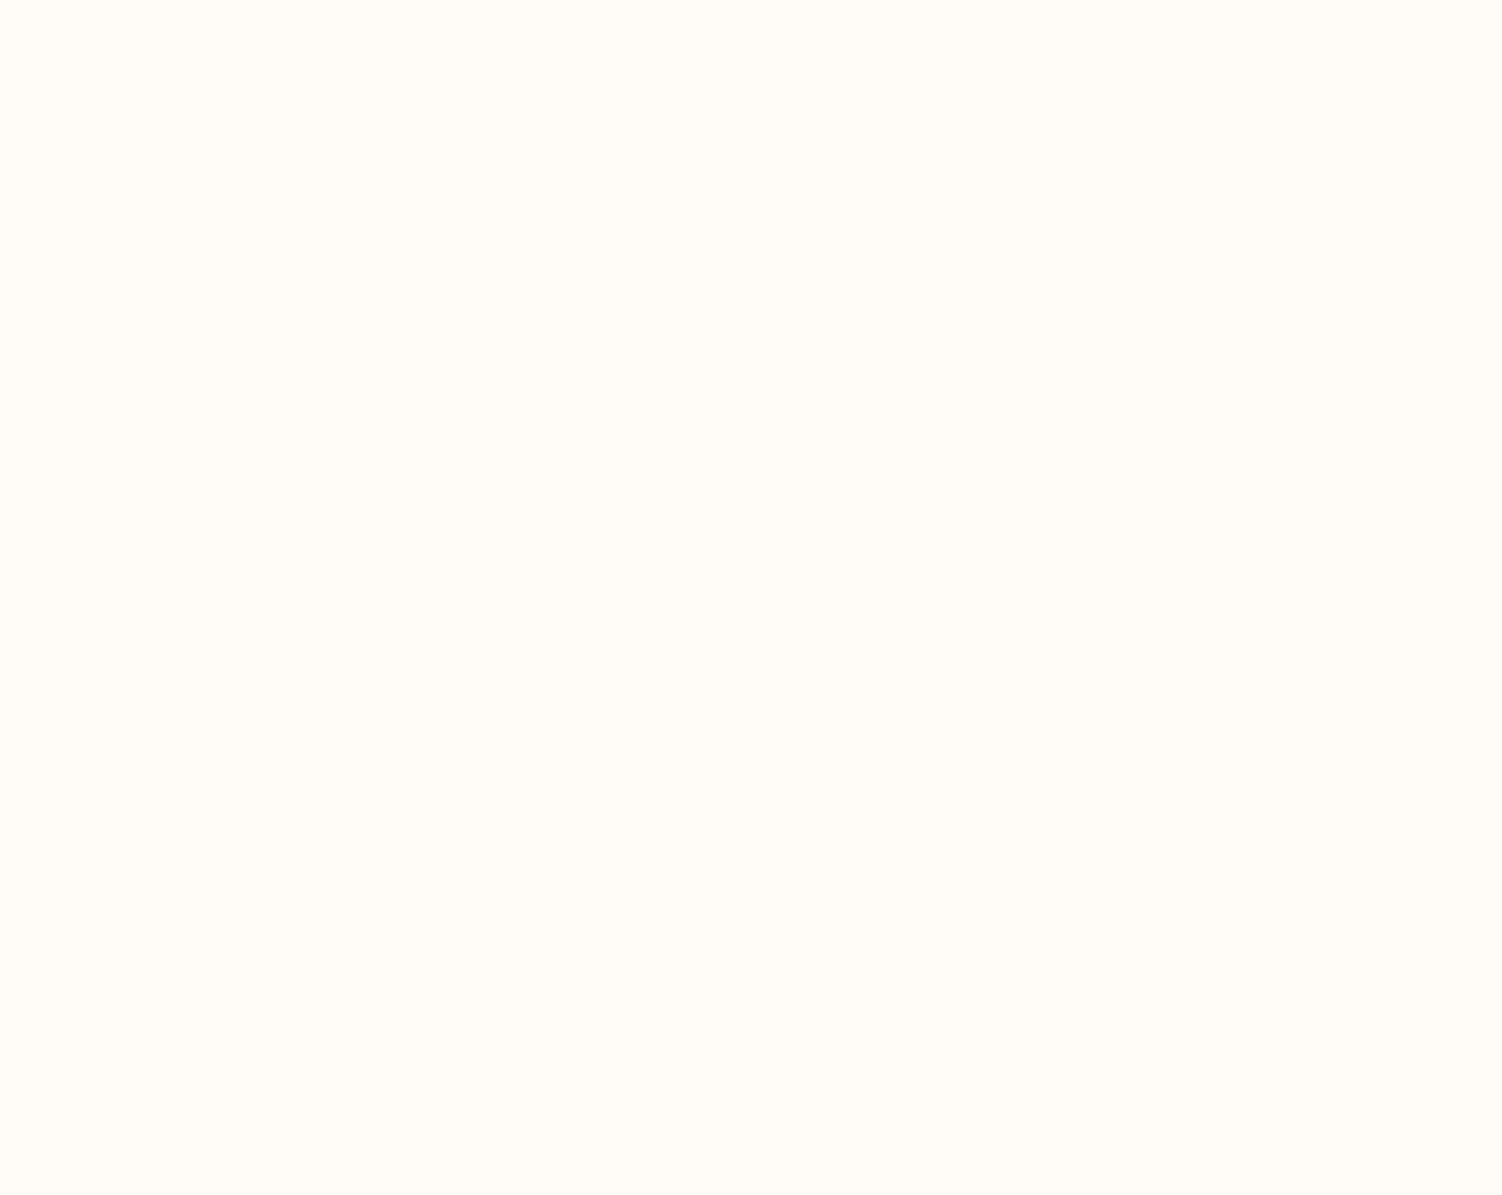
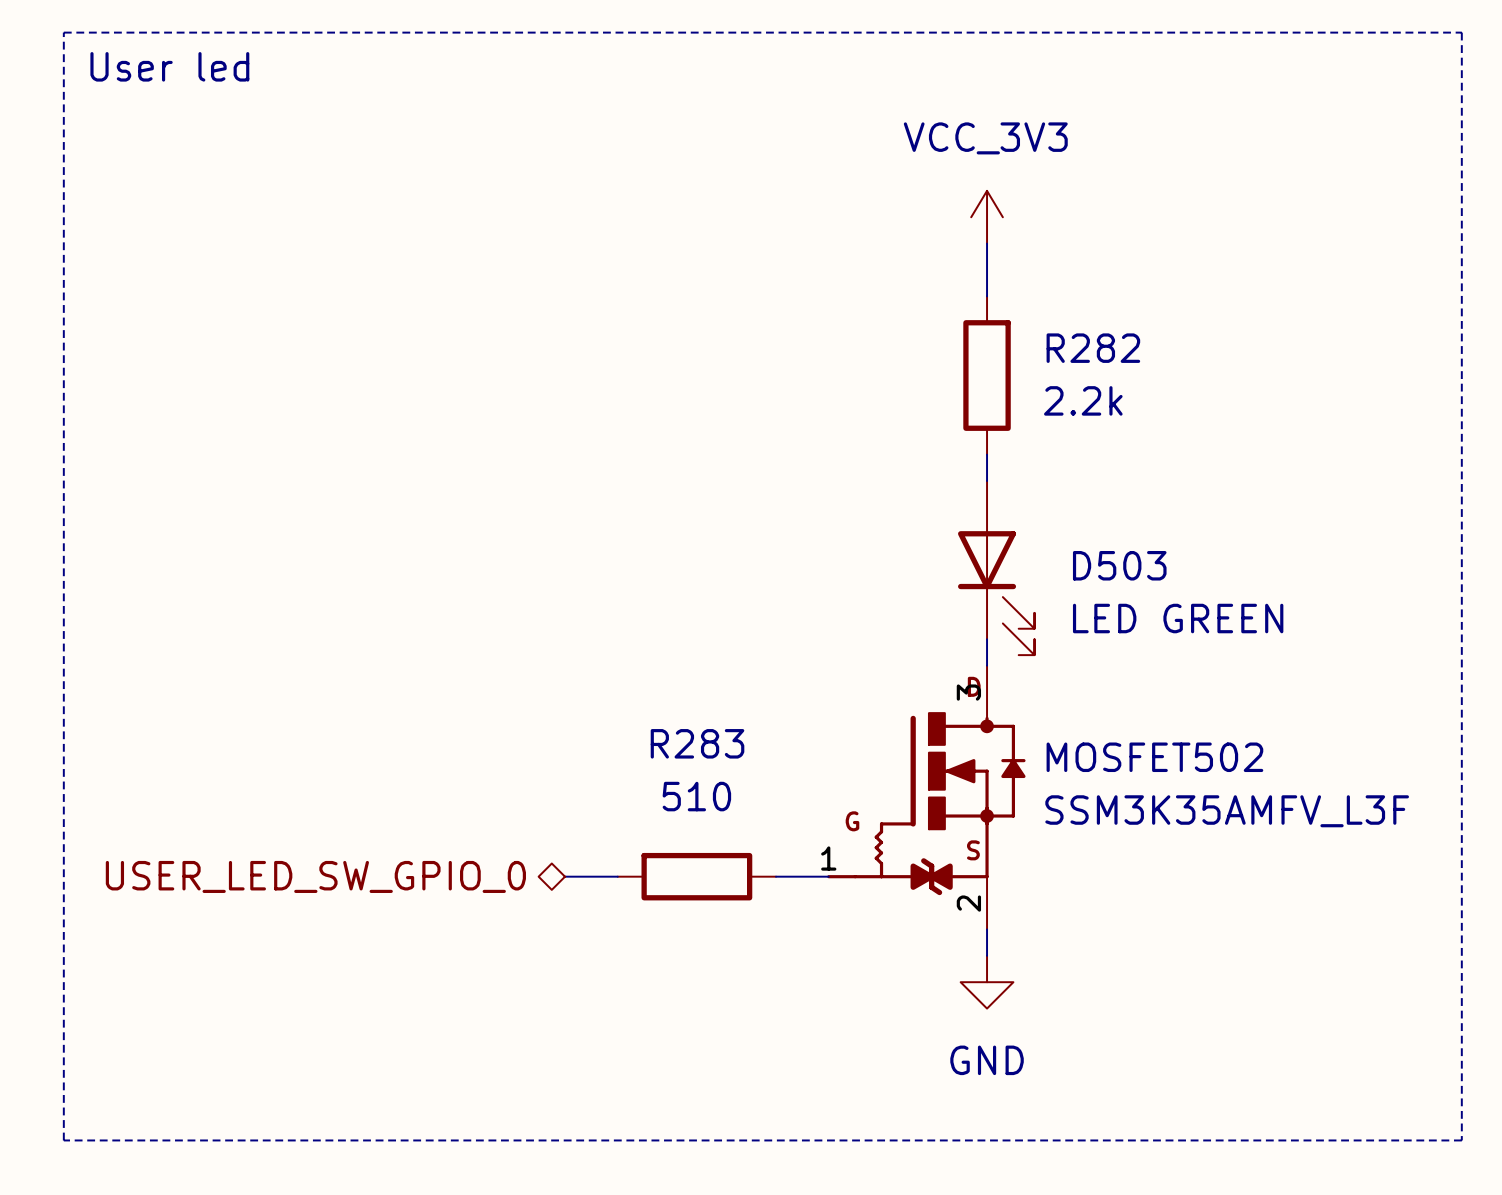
line: none -> (63, 32) (1461, 32) (1461, 1140) (63, 1140) (63, 32)
text: none -> User led (169, 66)
power symbol: none -> VCC_3V3 (987, 217)
wire: none -> (987, 243) (987, 296)
R282: none -> 2.2k (987, 375)
wire: none -> (987, 454) (987, 481)
D503: none -> LED GREEN (996, 568)
wire: none -> (987, 639) (987, 665)
MOSFET502: none -> SSM3K35AMFV_L3F (926, 797)
hierarchical label: none -> USER_LED_SW_GPIO_0 (315, 876)
wire: none -> (565, 876) (617, 876)
R283: none -> 510 (696, 876)
wire: none -> (776, 876) (828, 876)
wire: none -> (987, 929) (987, 955)
power symbol: none -> GND (987, 982)

